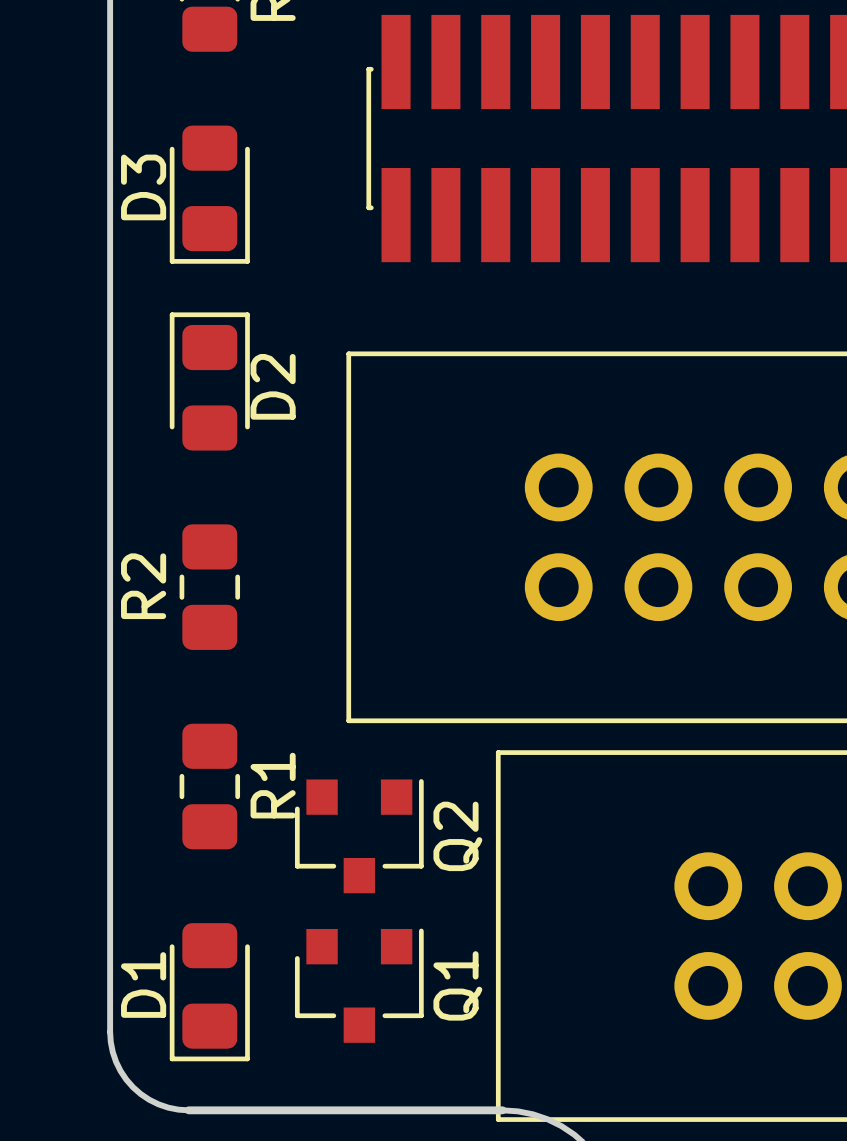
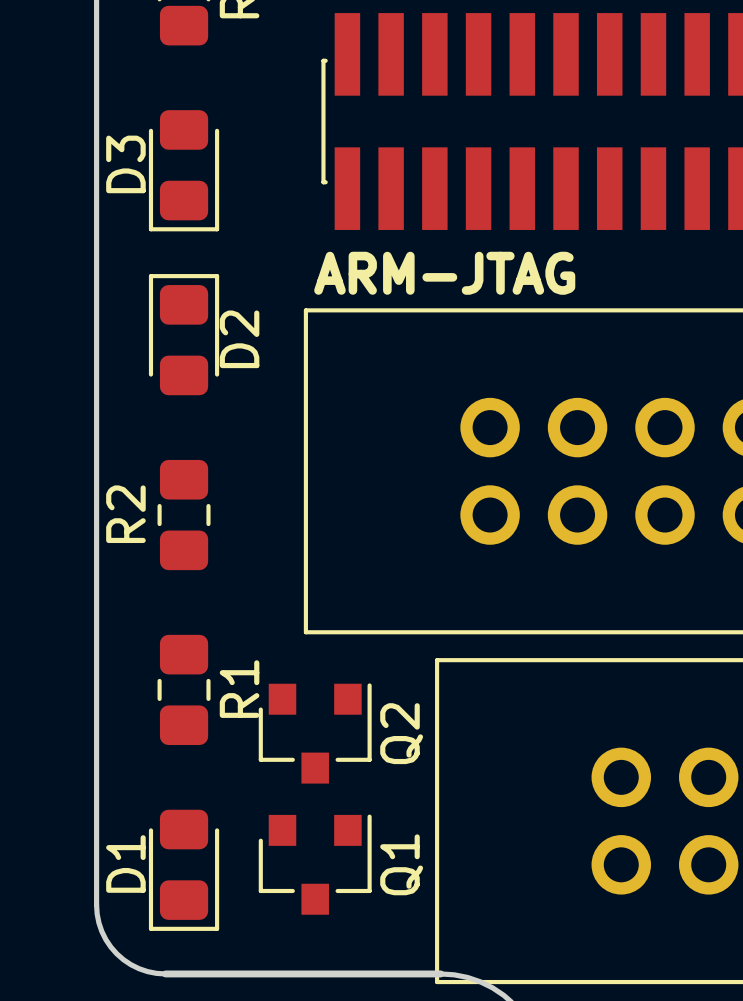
text: none -> ARM-JTAG (444, 273)

